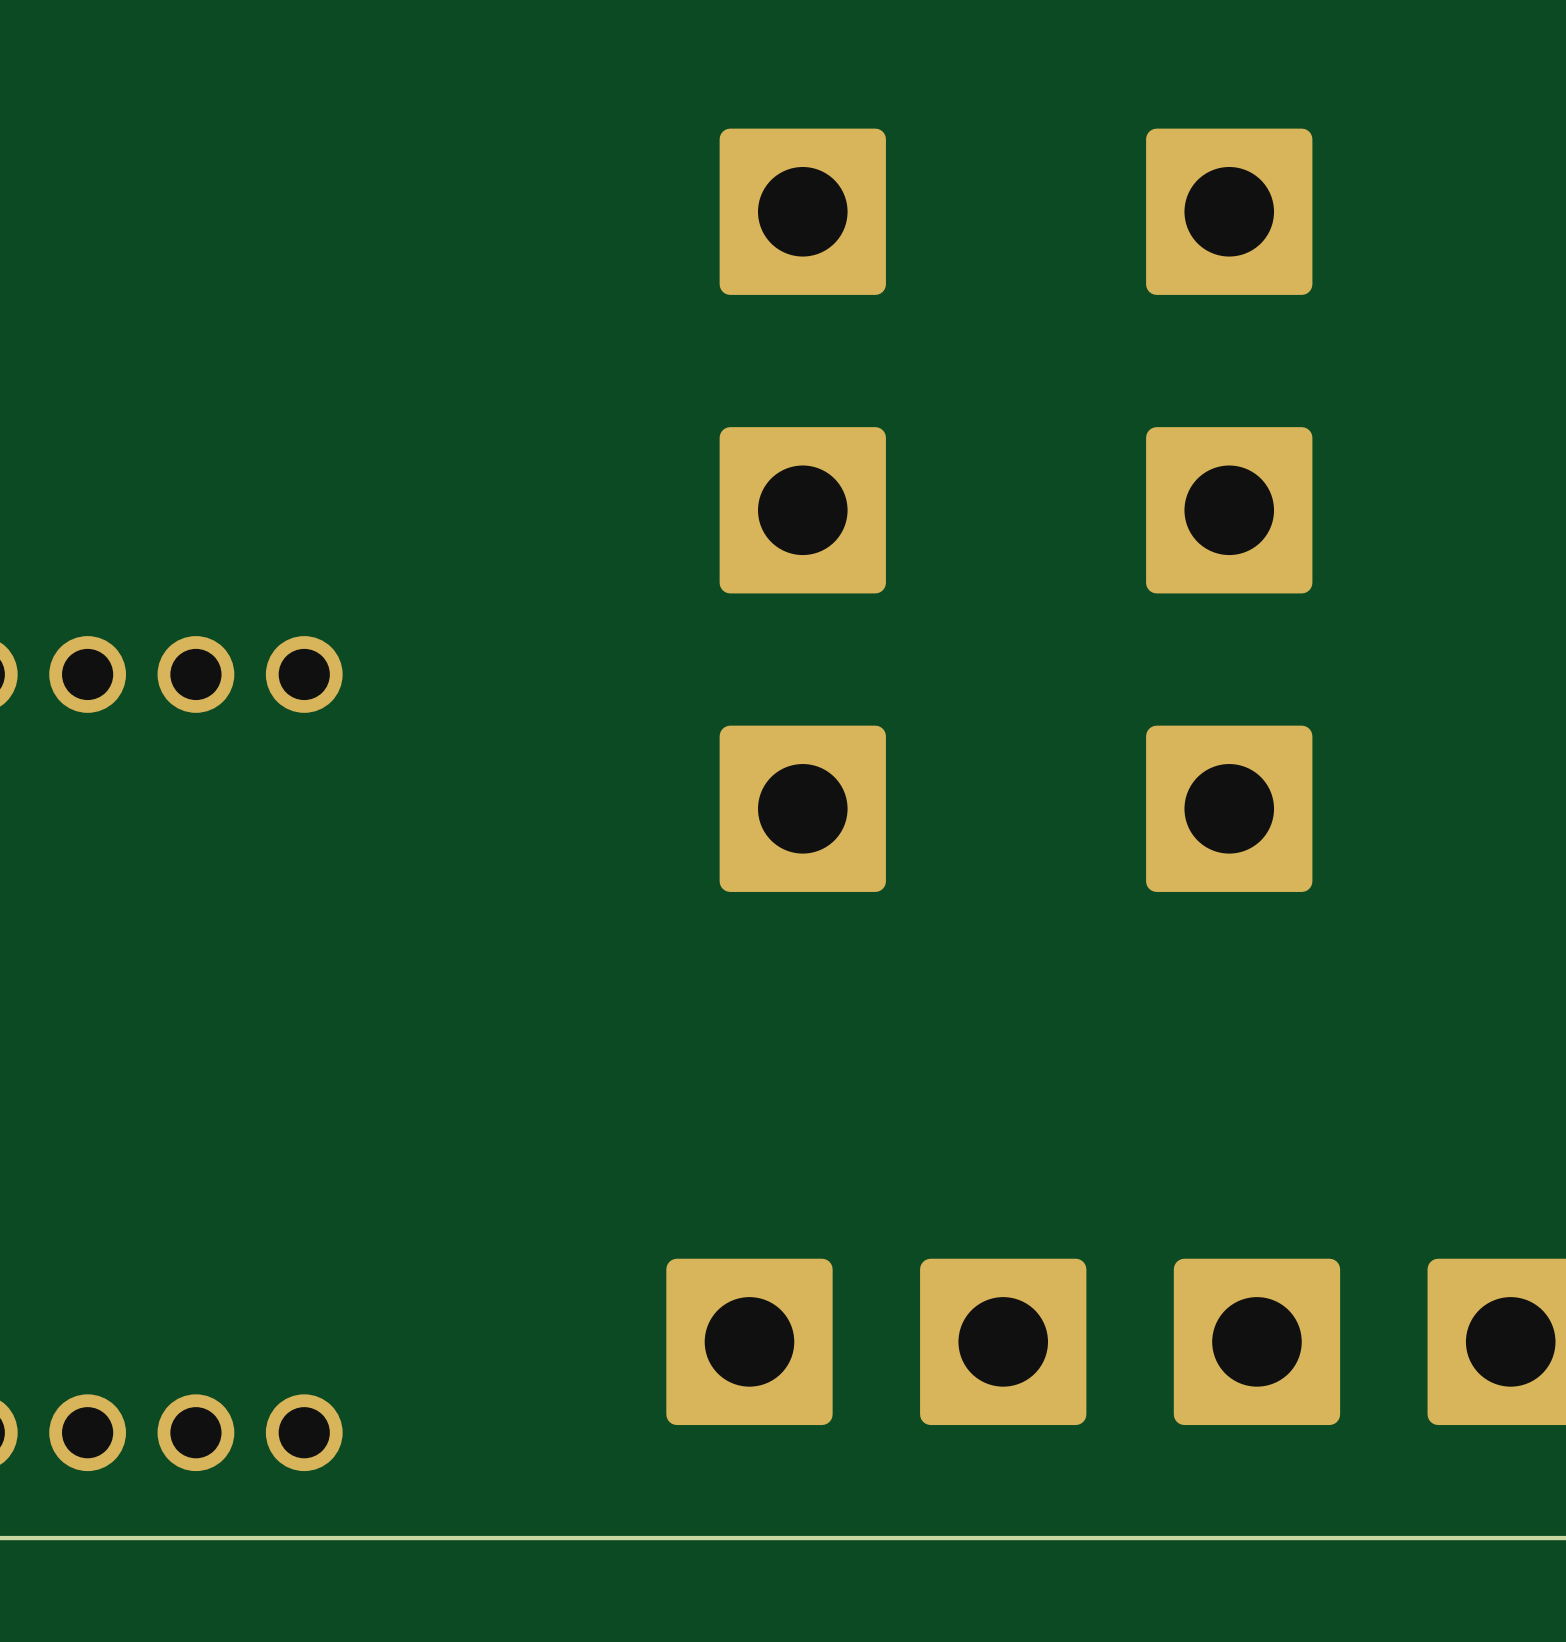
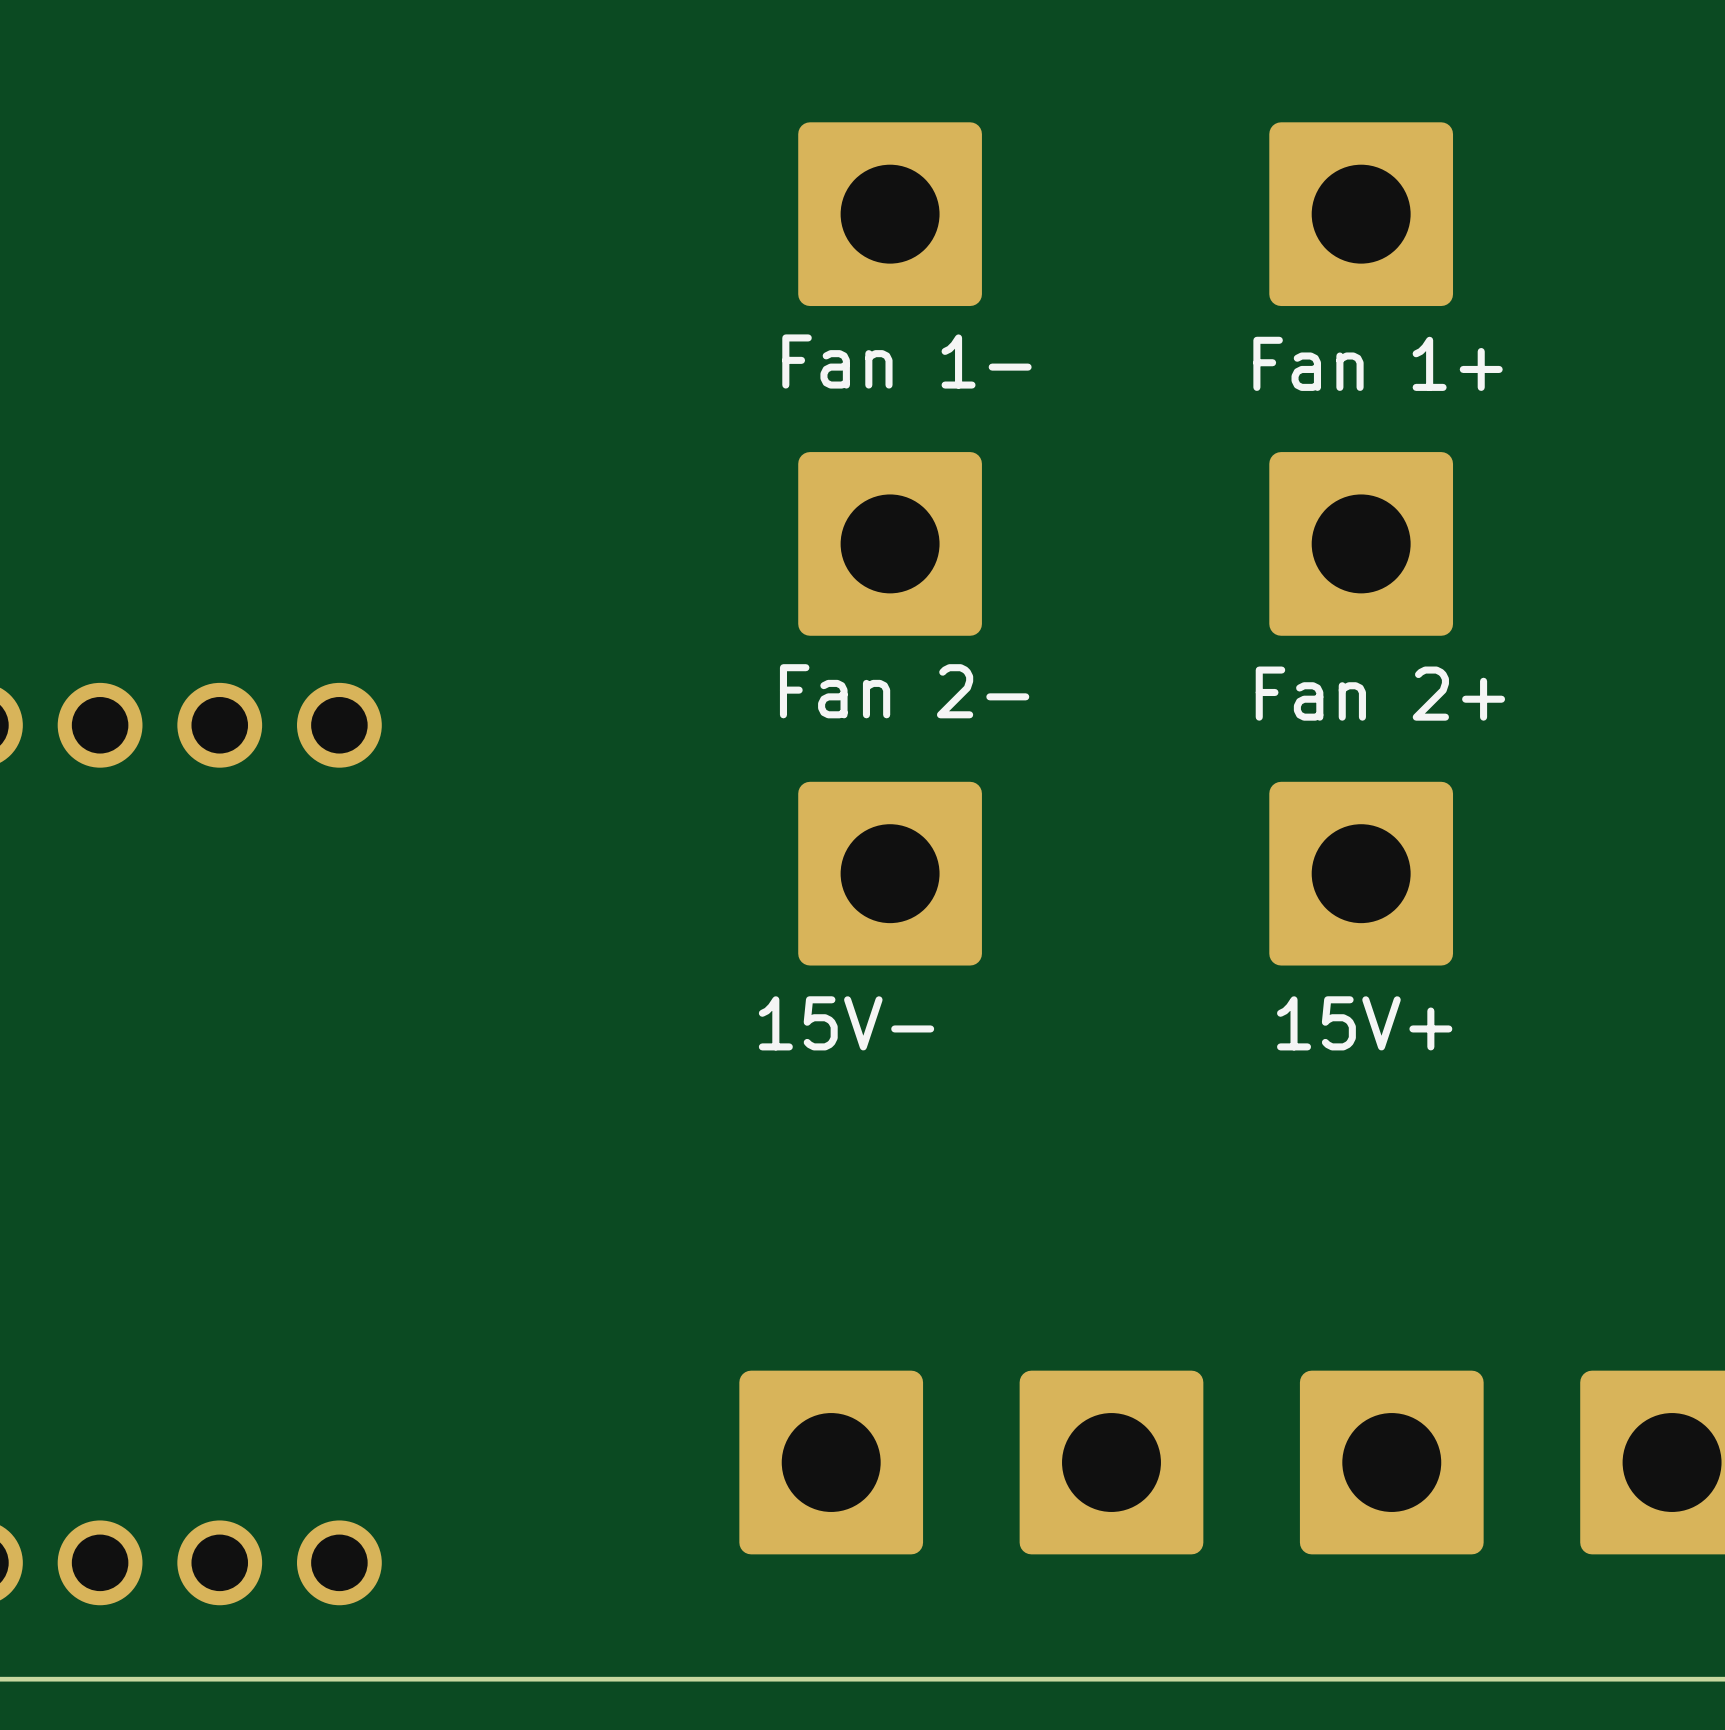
text: none -> Fan 1- (906, 361)
text: none -> Fan 1+ (1378, 363)
text: none -> Fan 2- (904, 691)
text: none -> Fan 2+ (1380, 693)
text: none -> 15V- (846, 1023)
text: none -> 15V+ (1364, 1023)

